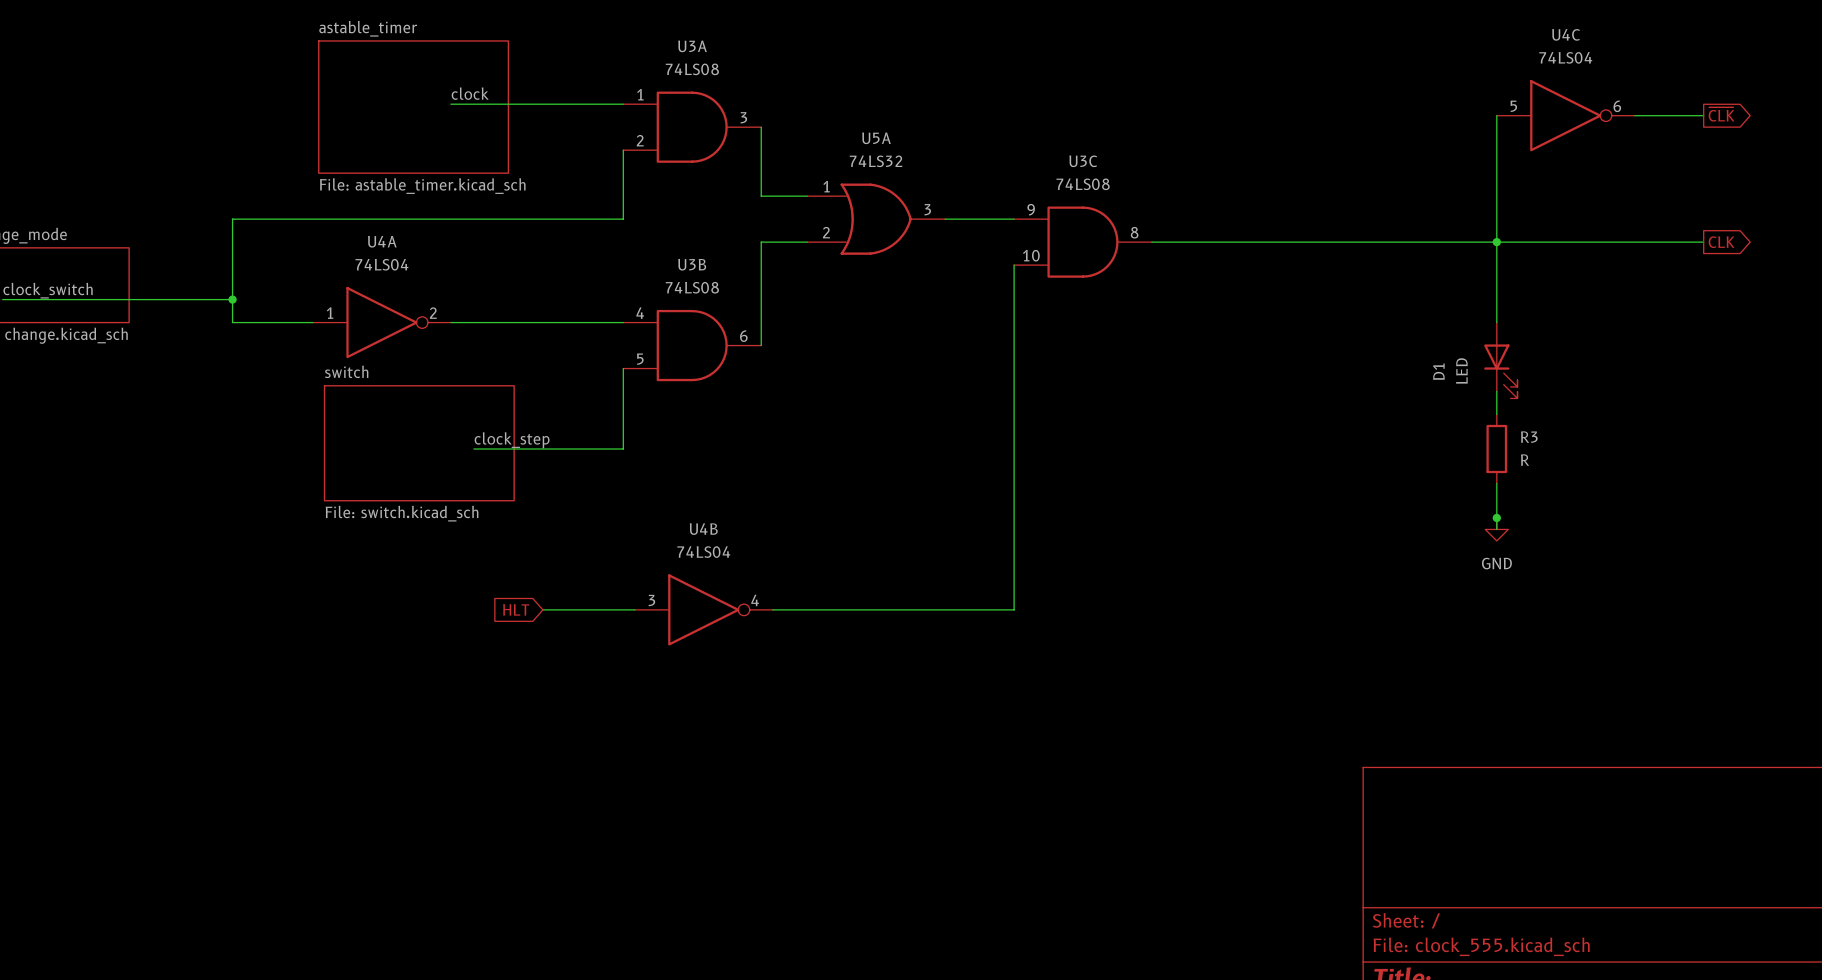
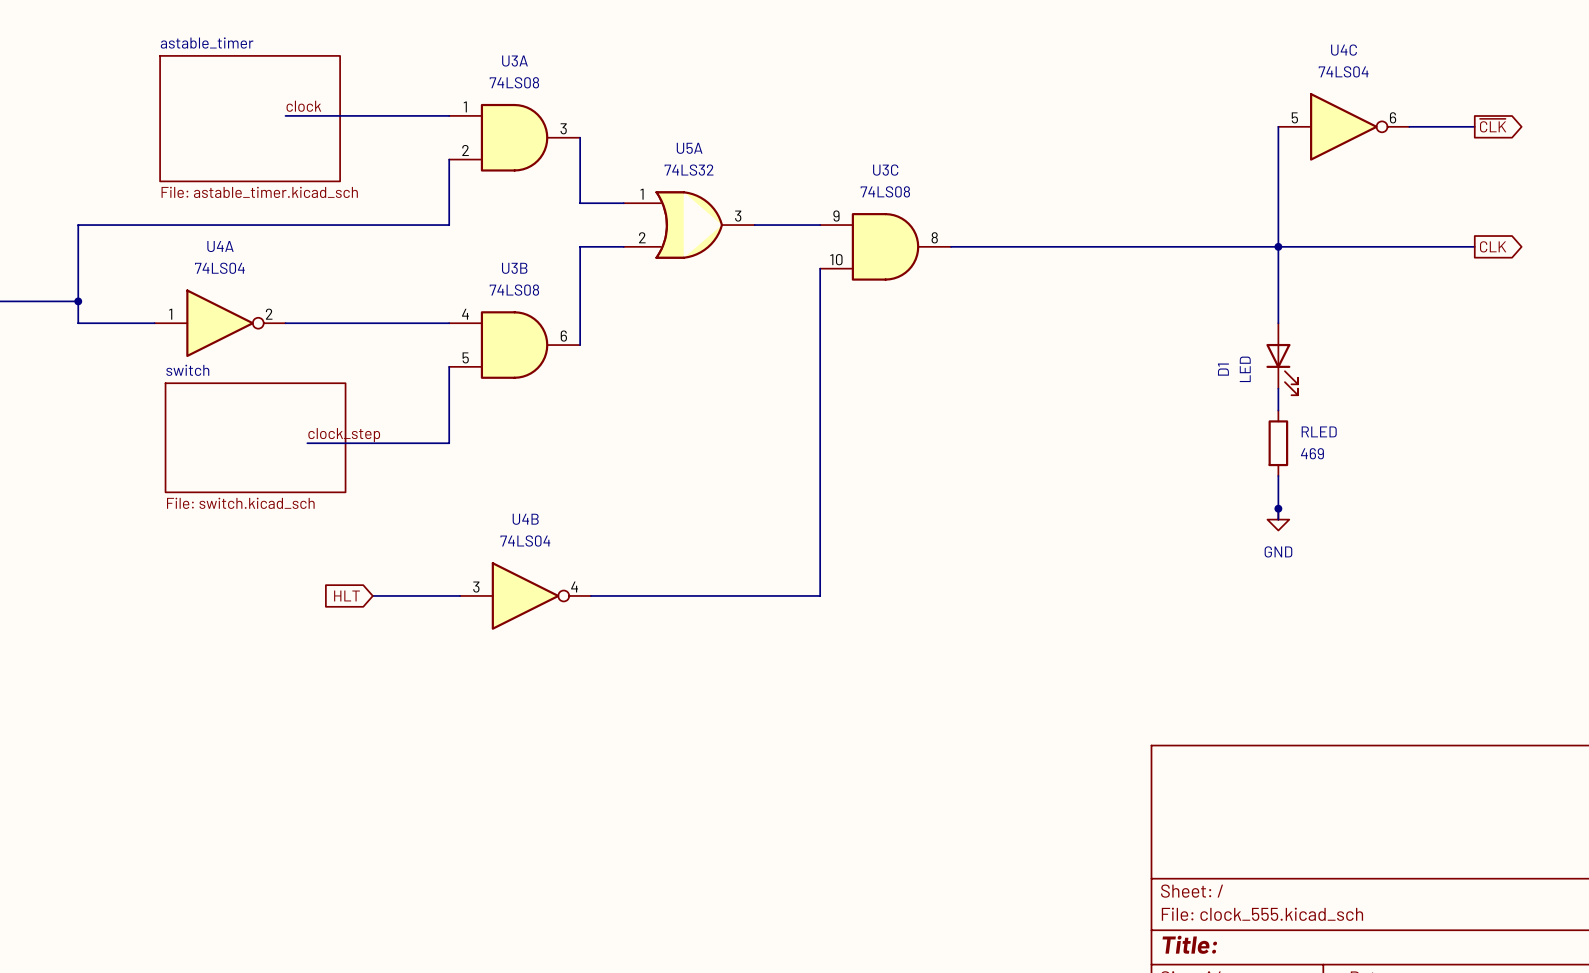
R3 name: R3 (1529, 437) -> RLED (1319, 431)
R3 value: R (1525, 460) -> 469 (1312, 453)

